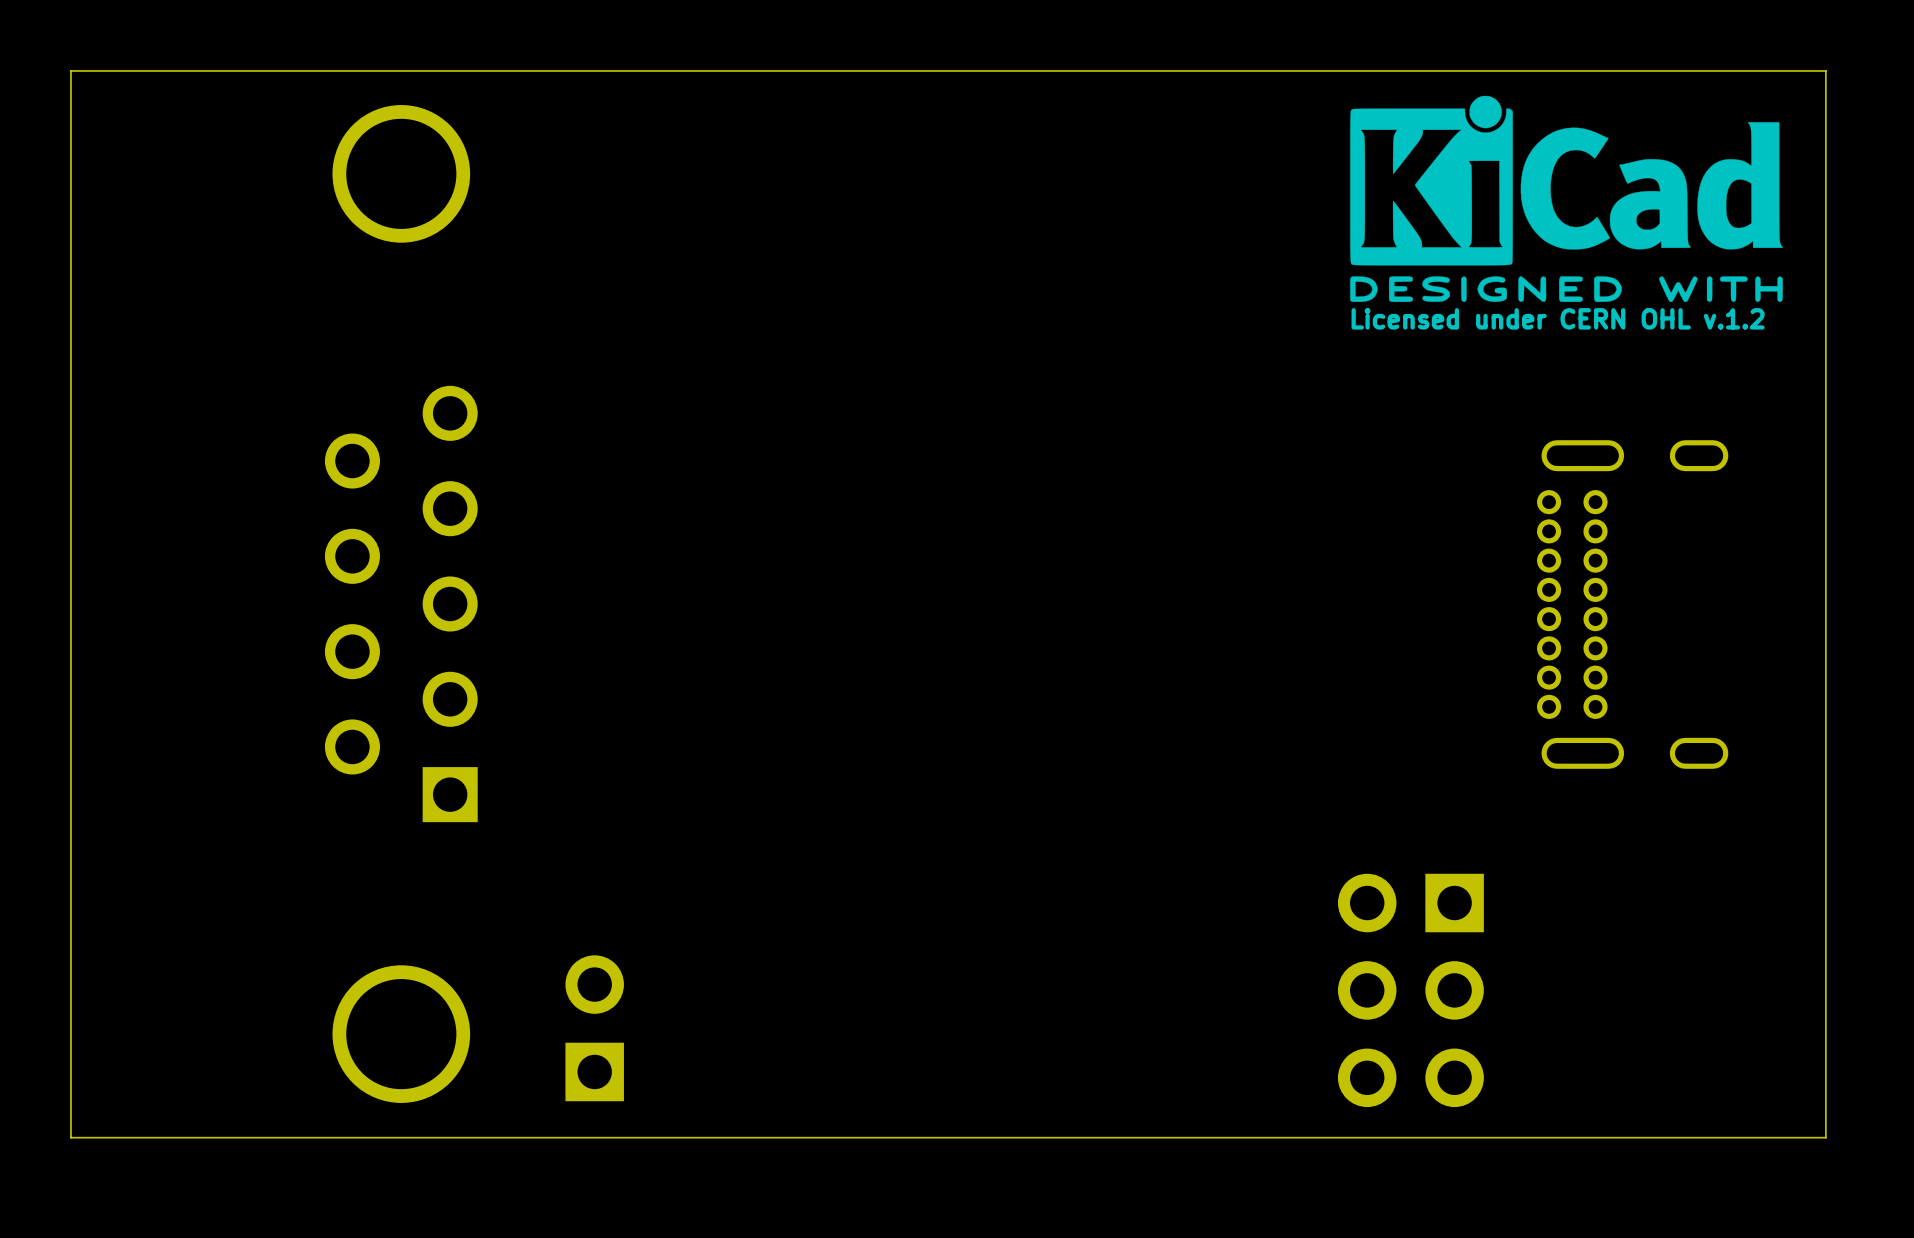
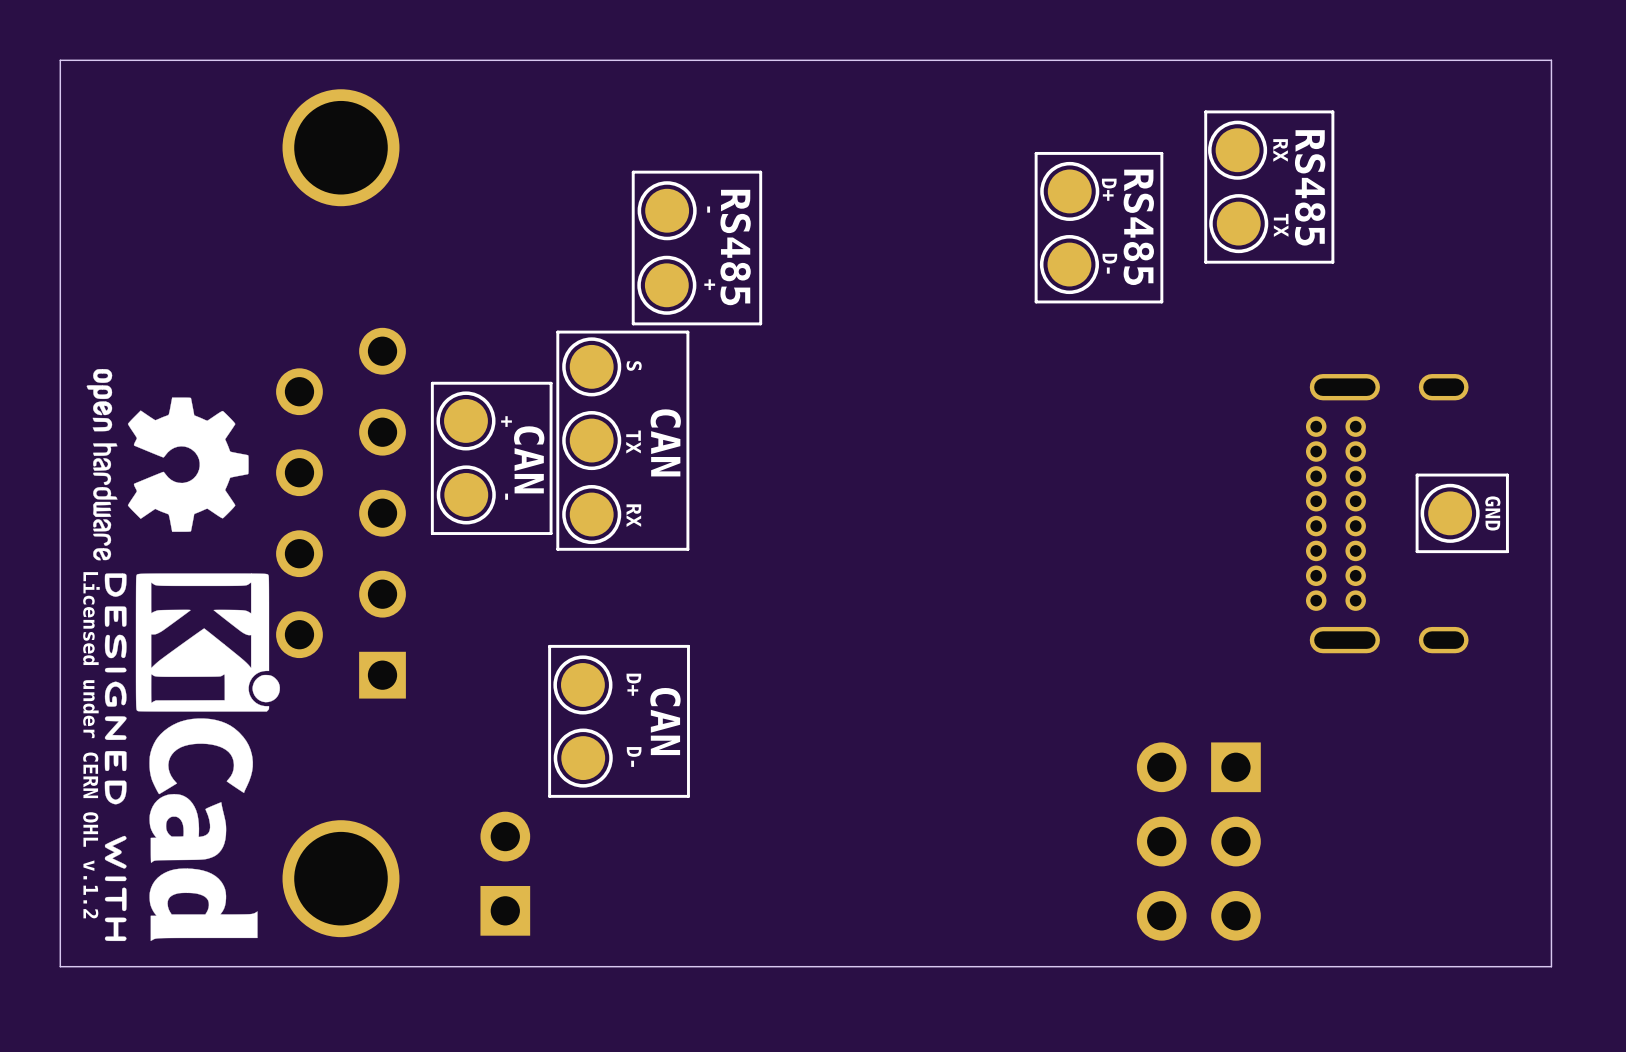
drawing: [1350, 95, 1783, 302] -> none
line: none -> (1332, 111) (1205, 111) (1205, 262) (1332, 262) (1332, 111)
part: none -> (1237, 150)
text: none -> RX (1280, 150)
line: none -> (1161, 153) (1036, 153) (1036, 301) (1161, 301) (1161, 153)
line: none -> (760, 172) (633, 172) (633, 323) (760, 323) (760, 172)
text: none -> D+ (1109, 189)
text: none -> RS485 (1310, 187)
part: none -> (1069, 191)
text: none -> - (708, 209)
part: none -> (667, 210)
part: none -> (1238, 223)
text: none -> TX (1281, 225)
text: none -> RS485 (1138, 227)
text: none -> RS485 (735, 247)
part: none -> (1069, 264)
text: none -> D- (1109, 263)
text: Licensed under CERN OHL v.1.2 (1558, 318) -> none
part: none -> (666, 285)
text: none -> + (709, 284)
line: none -> (687, 332) (557, 332) (557, 549) (687, 549) (687, 332)
text: none -> S (634, 366)
part: none -> (591, 366)
drawing: none -> [86, 369, 280, 942]
line: none -> (551, 383) (432, 383) (432, 533) (551, 533) (551, 383)
part: none -> (465, 420)
text: none -> + (506, 421)
part: none -> (591, 440)
text: none -> TX (633, 442)
text: none -> CAN (665, 442)
text: none -> CAN (529, 459)
line: none -> (1507, 475) (1417, 475) (1417, 551) (1507, 551) (1507, 475)
part: none -> (466, 494)
text: none -> - (506, 496)
part: none -> (1450, 513)
text: none -> GND (1492, 513)
part: none -> (591, 514)
text: none -> RX (633, 515)
line: none -> (688, 646) (549, 646) (549, 796) (688, 796) (688, 646)
text: none -> D+ (633, 684)
part: none -> (582, 684)
text: none -> CAN (665, 721)
text: none -> Licensed under CERN OHL v.1.2 (91, 745)
text: none -> D- (634, 756)
part: none -> (583, 758)

